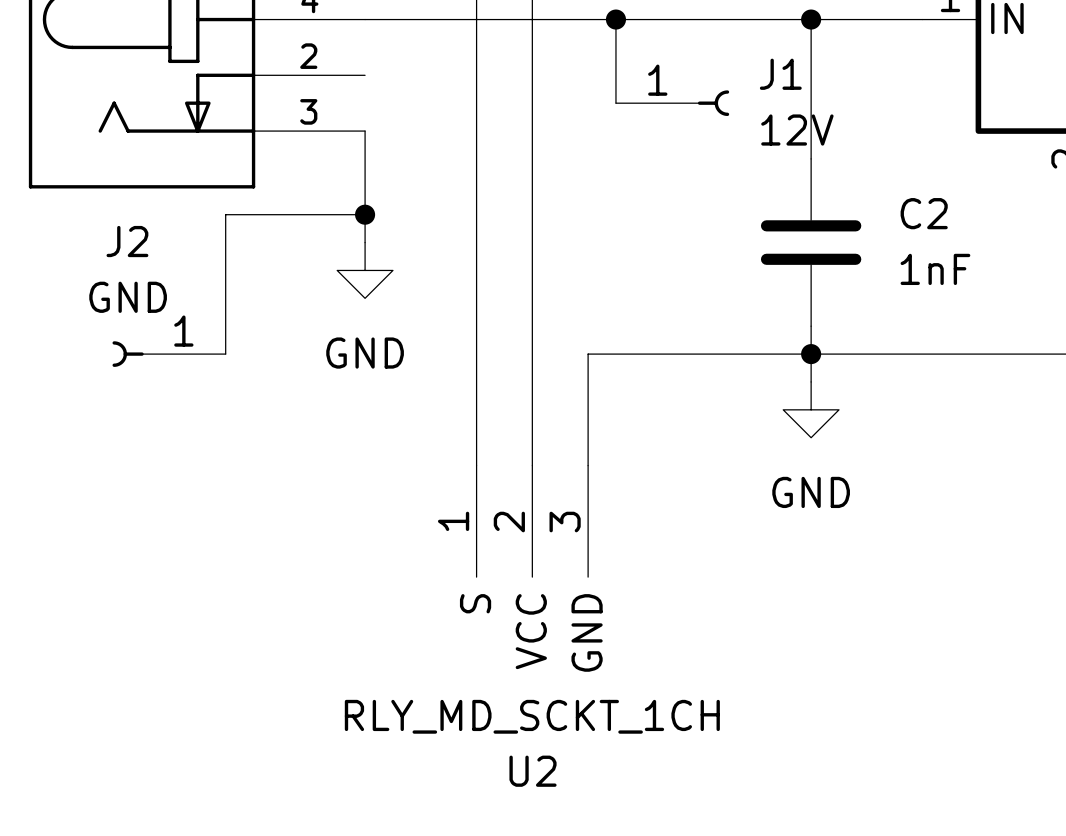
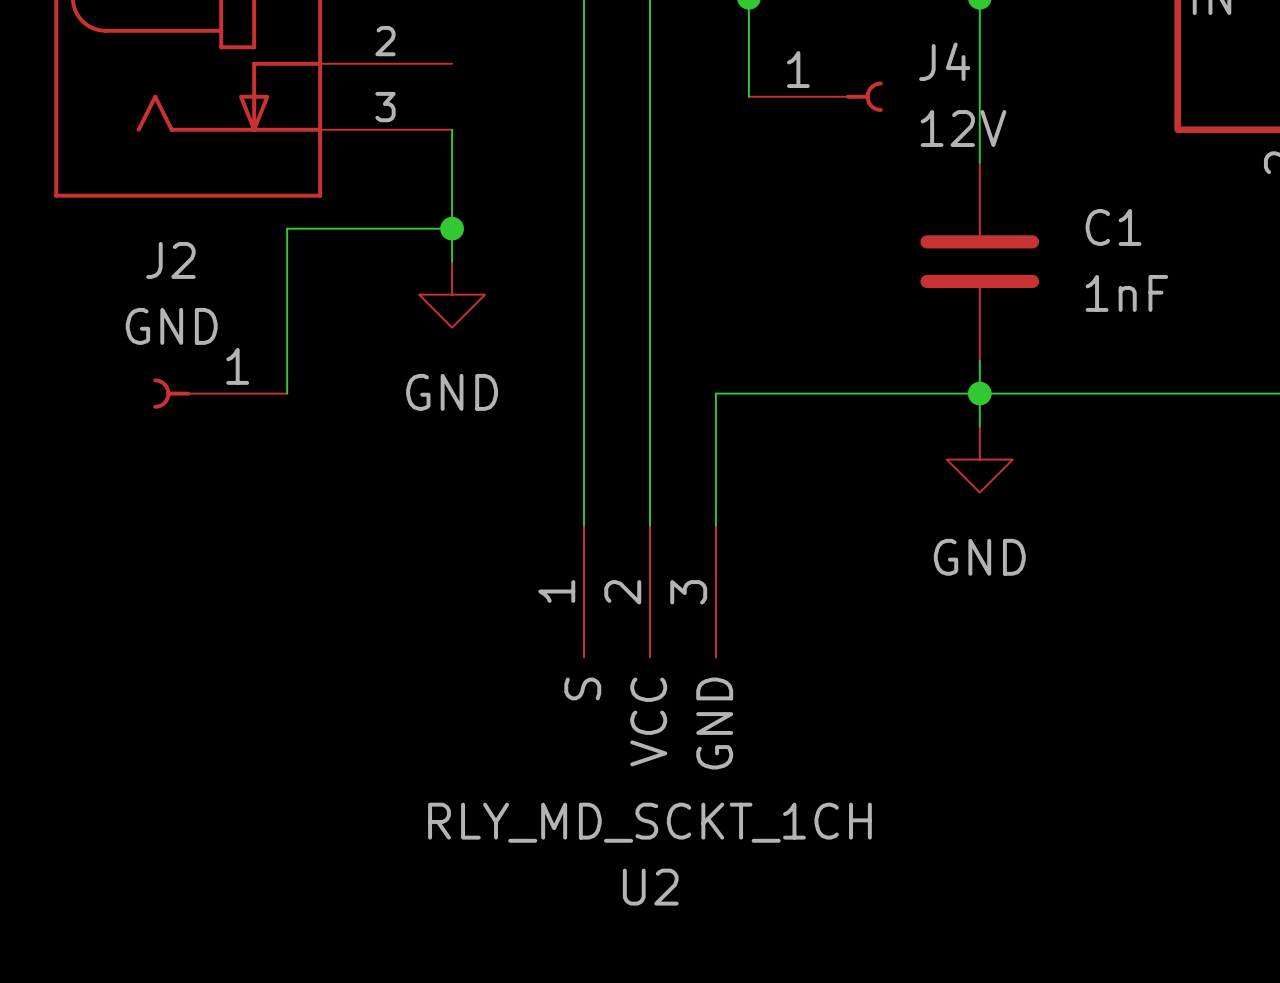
J1 name: J1 (780, 74) -> J4 (944, 61)
C2 name: C2 (924, 213) -> C1 (1113, 227)

